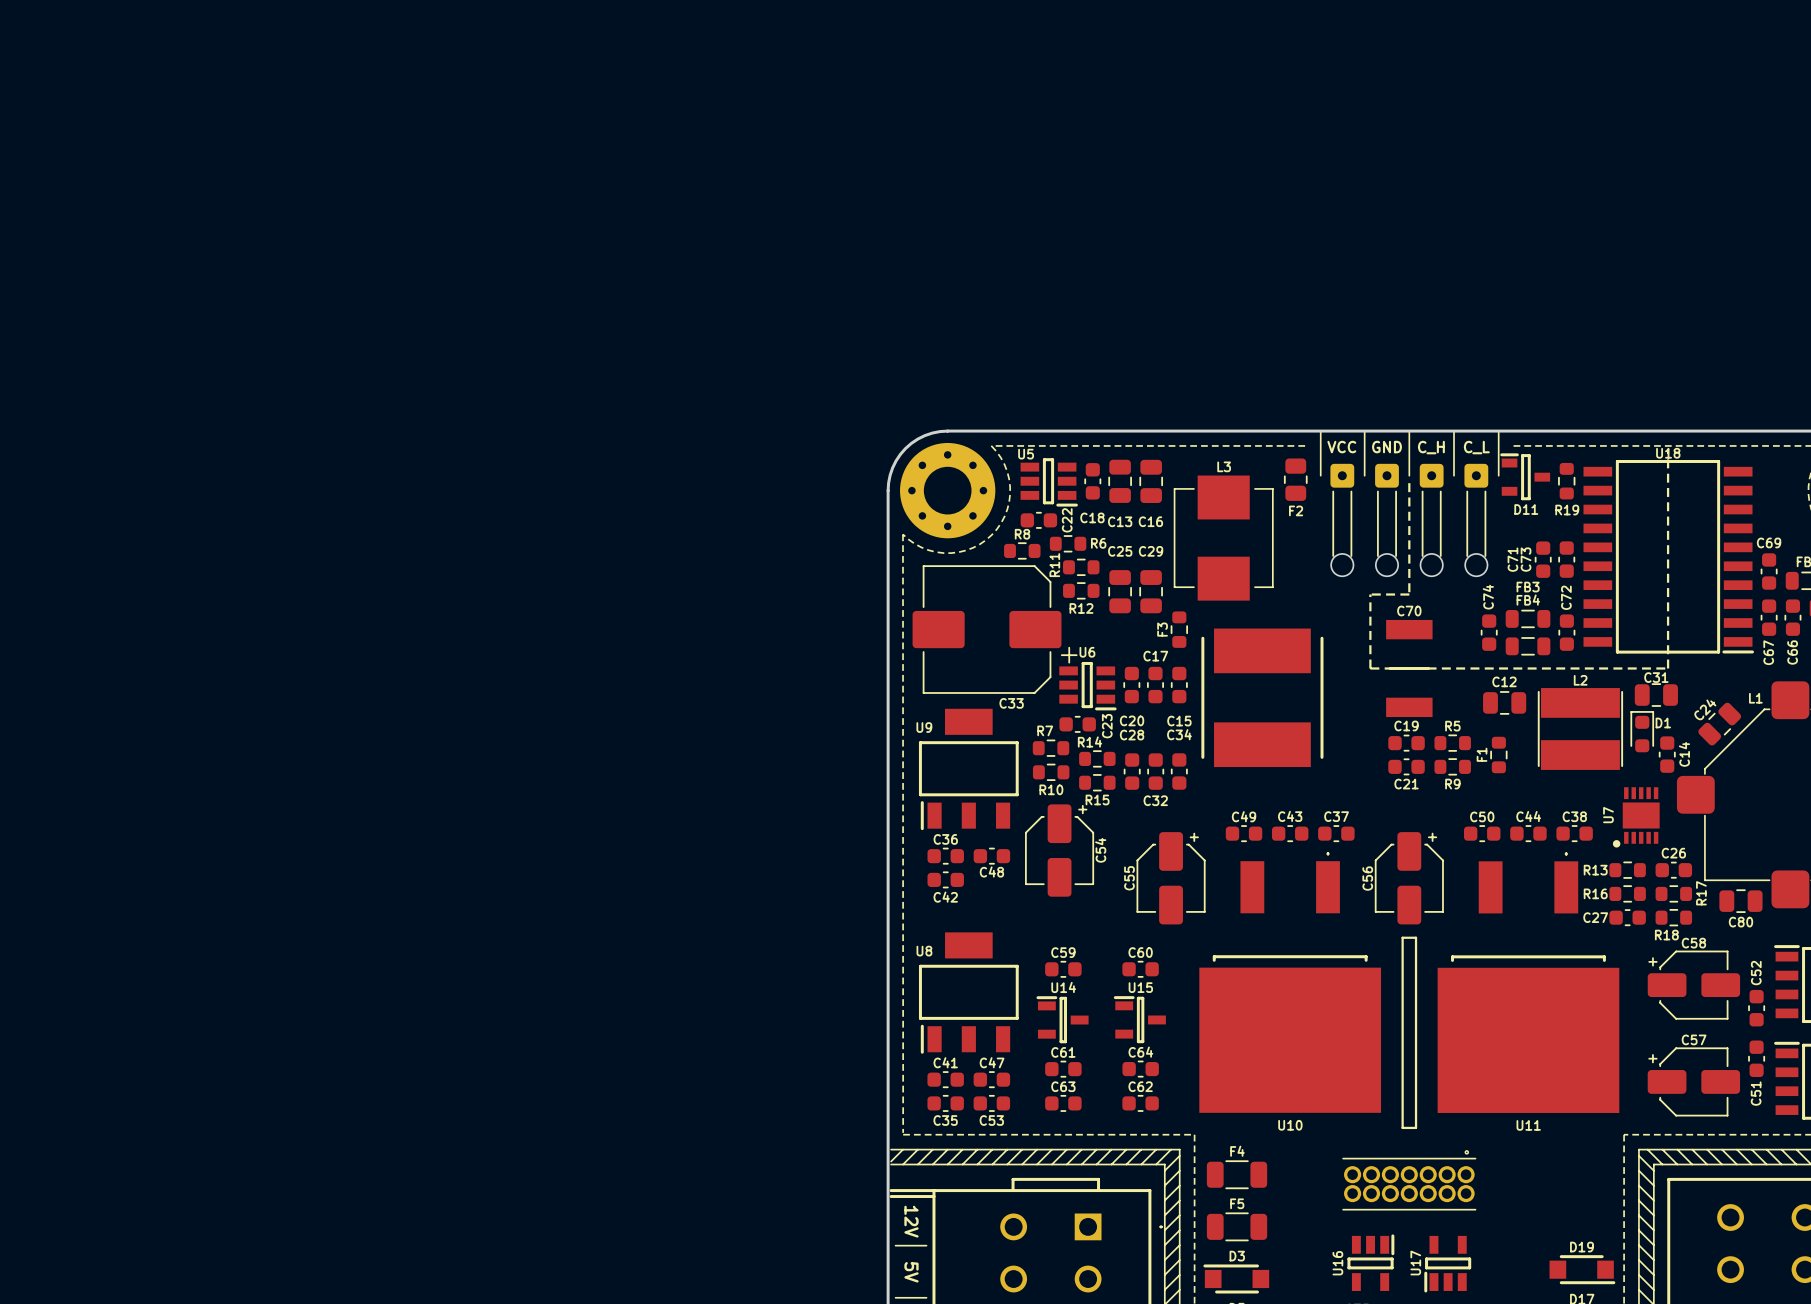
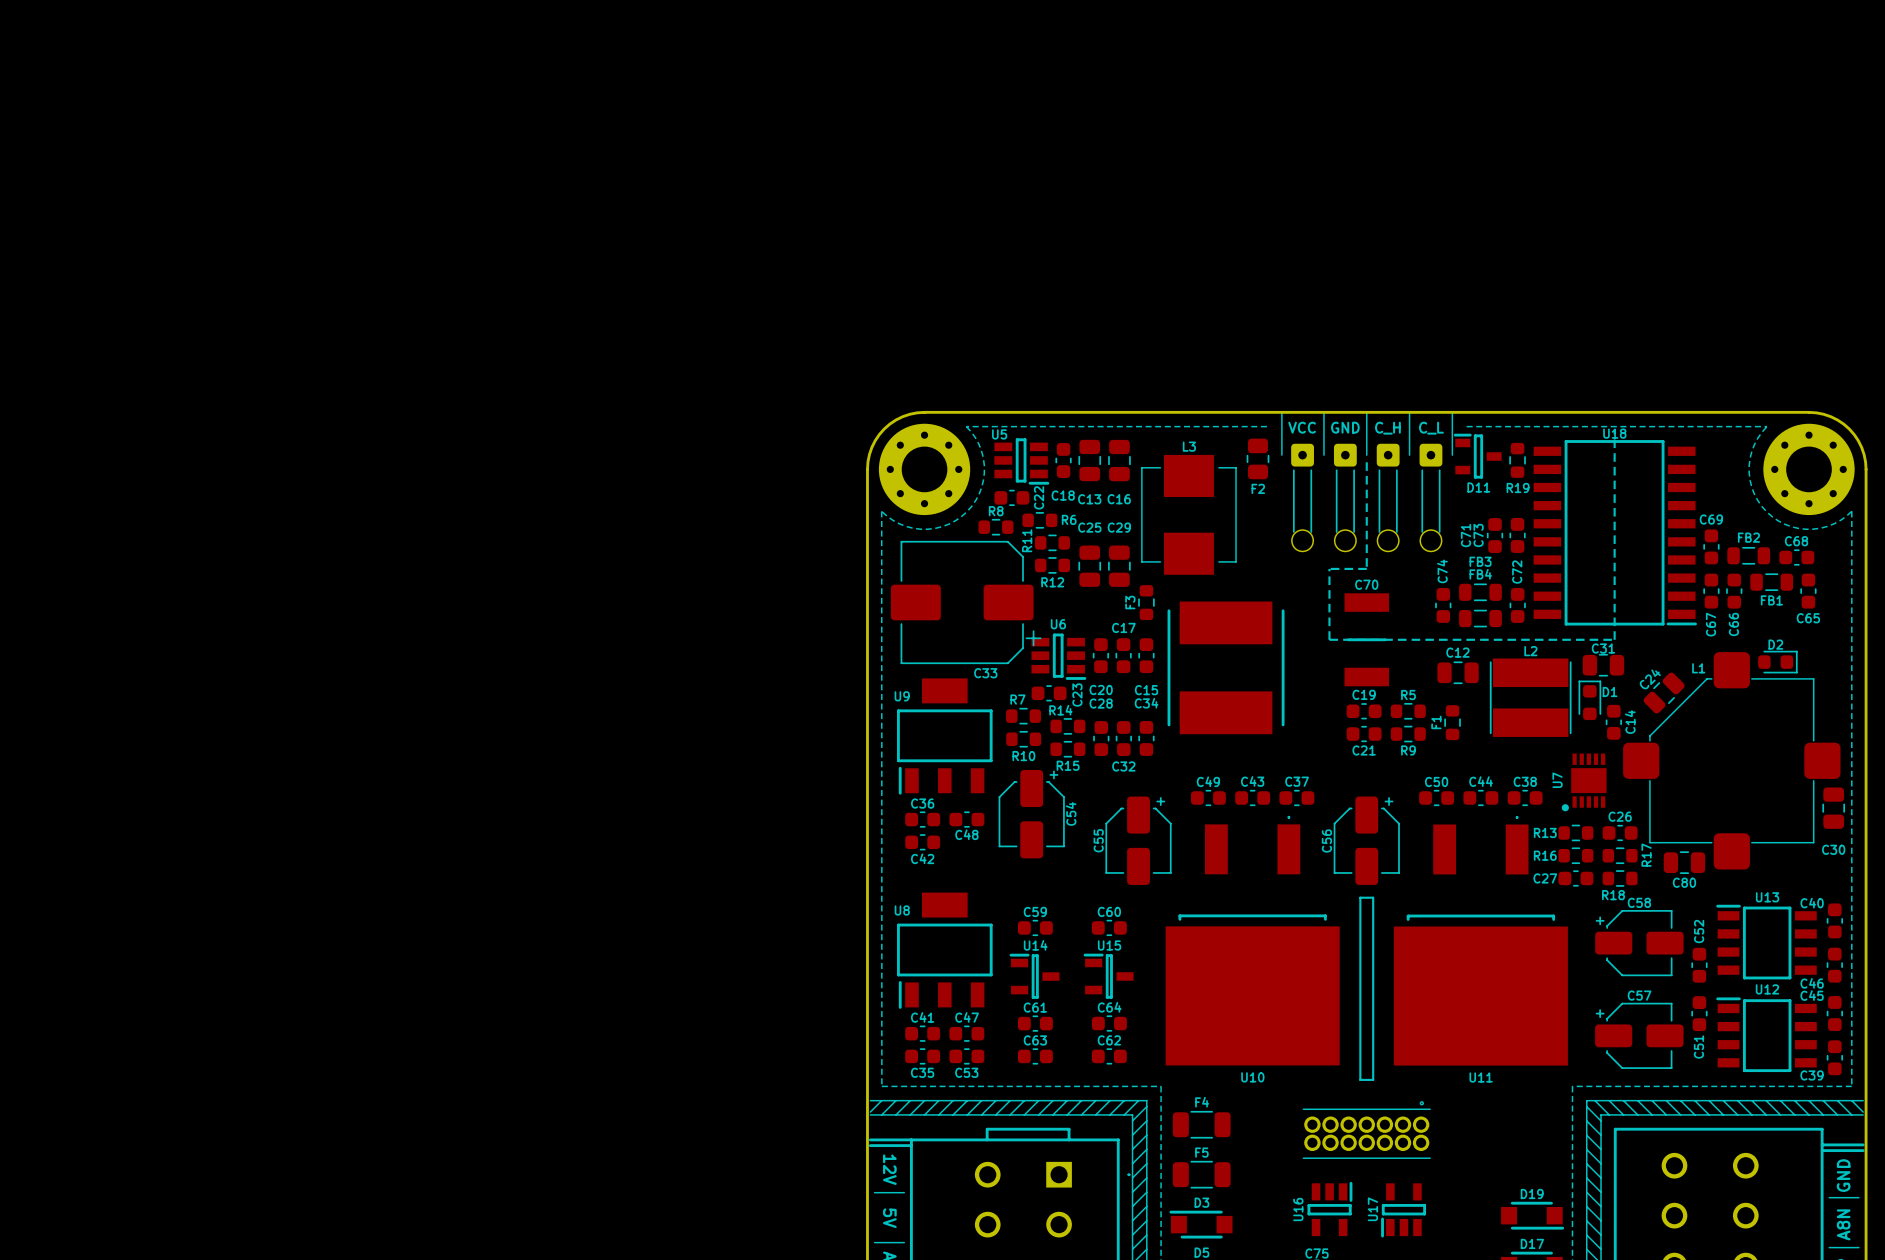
C33 footprint: [912, 565, 1078, 694] -> [890, 540, 1042, 665]

